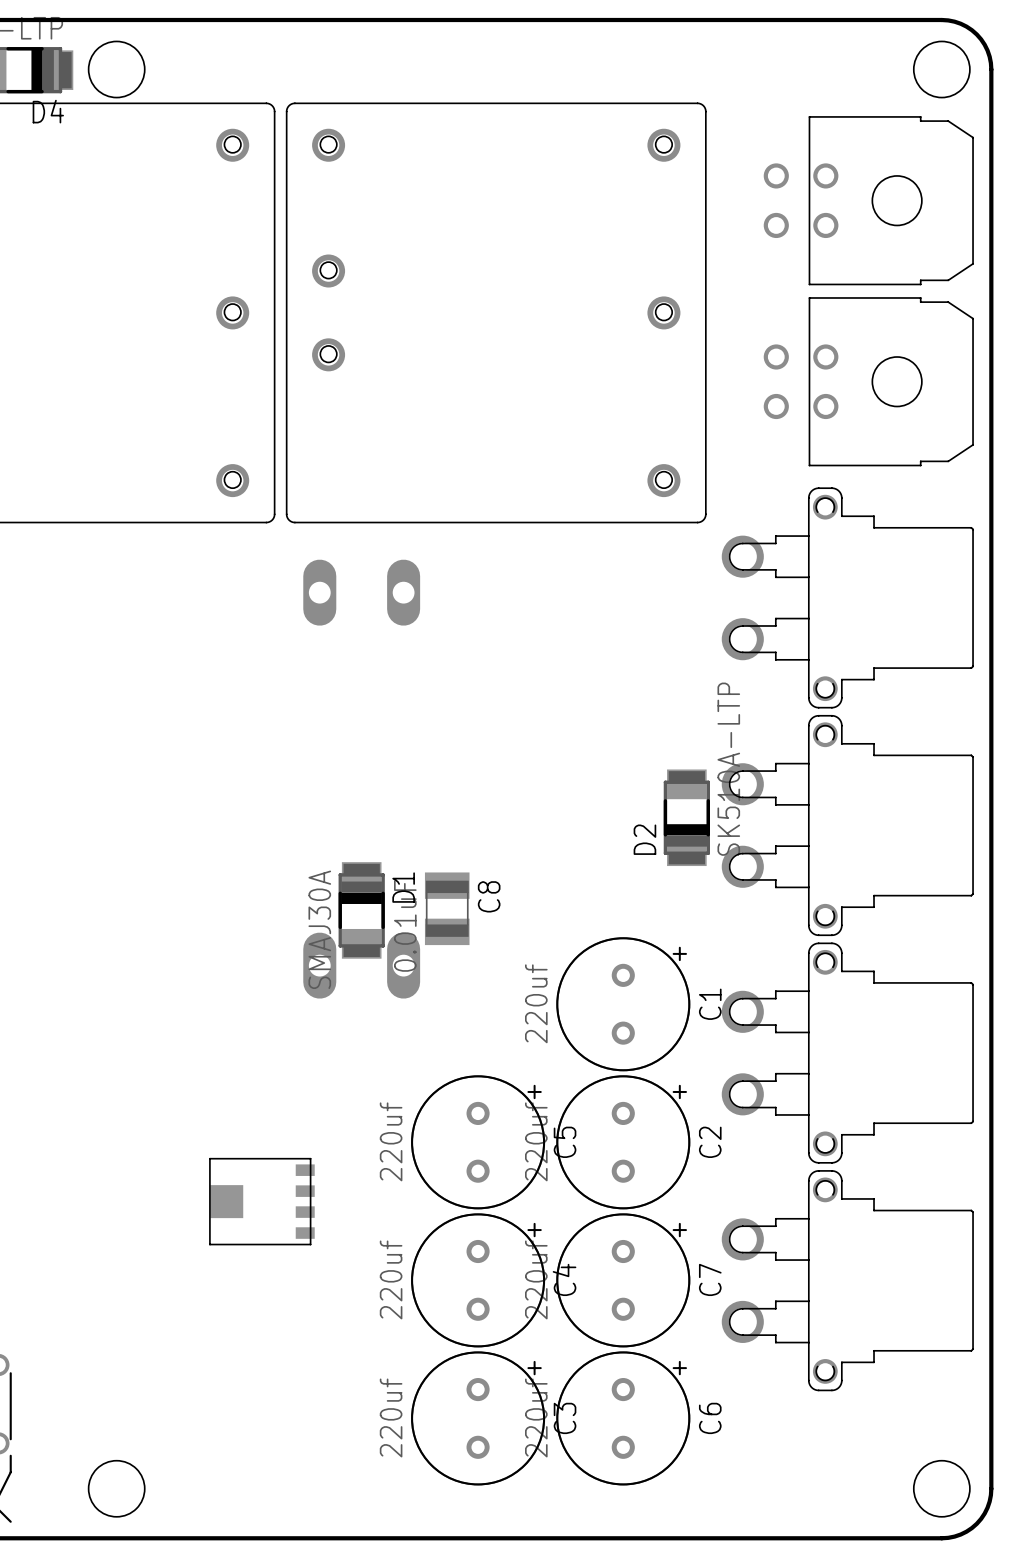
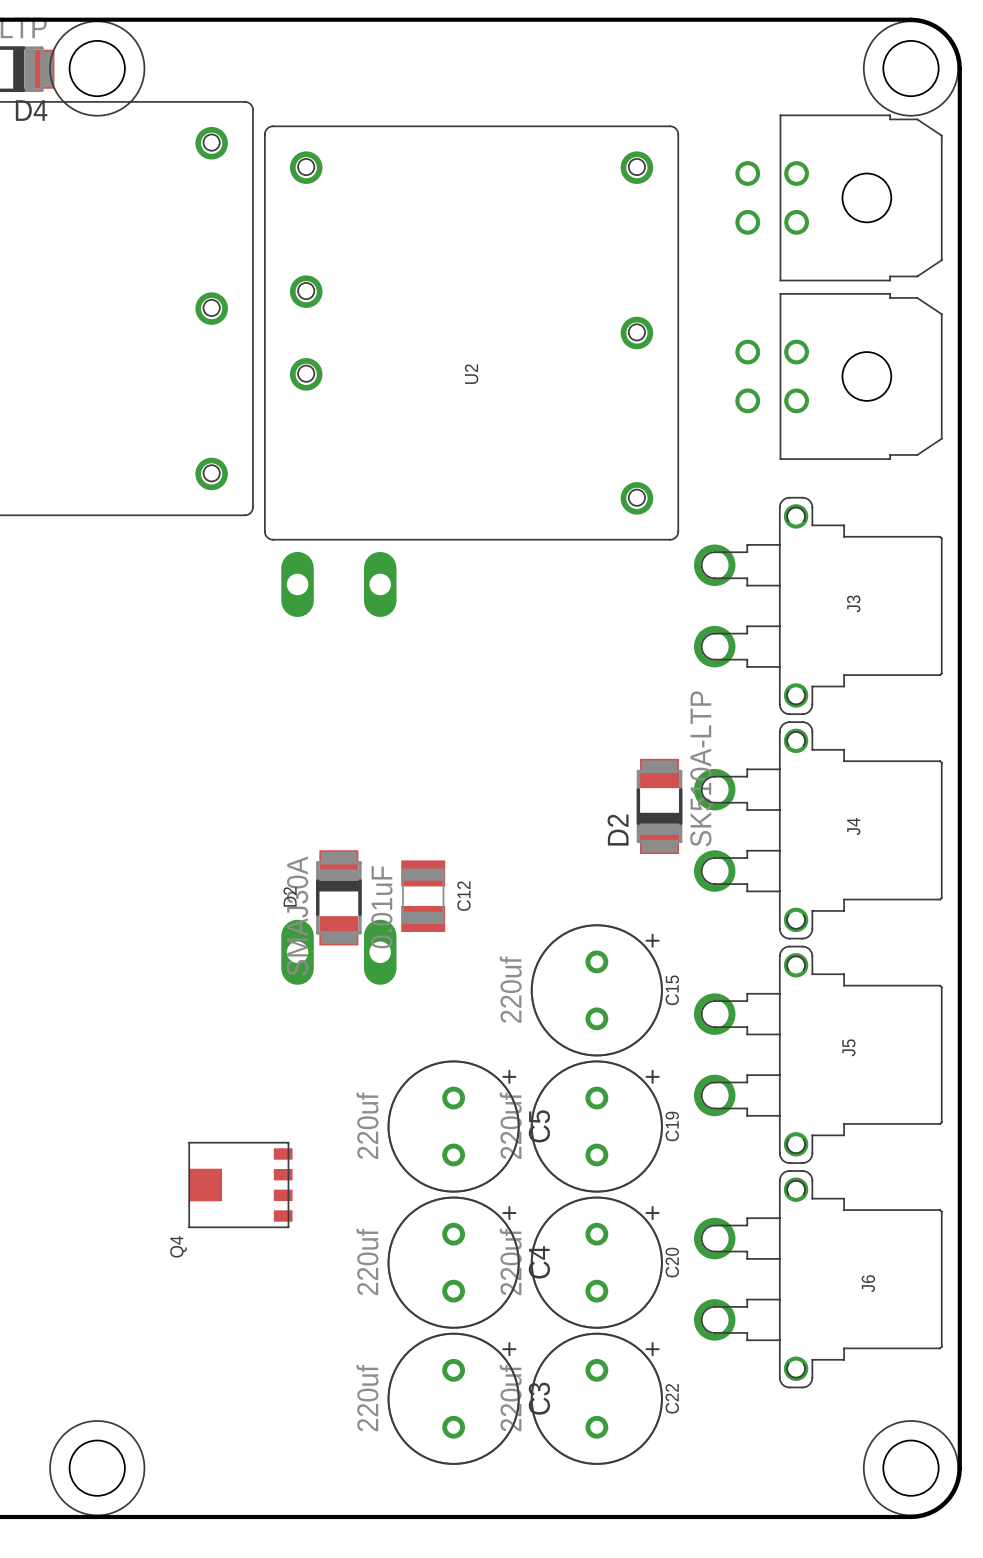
drawing: none -> [49, 21, 145, 116]
drawing: none -> [863, 21, 959, 116]
part: (496, 312) -> none
U2: none -> (471, 333)
part: (847, 597) -> none
J3: none -> (818, 605)
part: (847, 825) -> none
J4: none -> (818, 830)
D1 name: D1 (403, 887) -> D2 (290, 896)
C8 name: C8 (489, 896) -> C12 (463, 896)
C1 name: C1 (710, 1004) -> C15 (672, 990)
part: (847, 1053) -> none
J5: none -> (818, 1054)
C2 name: C2 (710, 1142) -> C19 (672, 1126)
Q4 name: none -> Q4 (178, 1246)
C7 name: C7 (710, 1279) -> C20 (672, 1262)
part: (847, 1280) -> none
J6: none -> (818, 1279)
C6 name: C6 (710, 1418) -> C22 (672, 1398)
drawing: none -> [49, 1420, 145, 1516]
drawing: none -> [863, 1420, 959, 1516]

